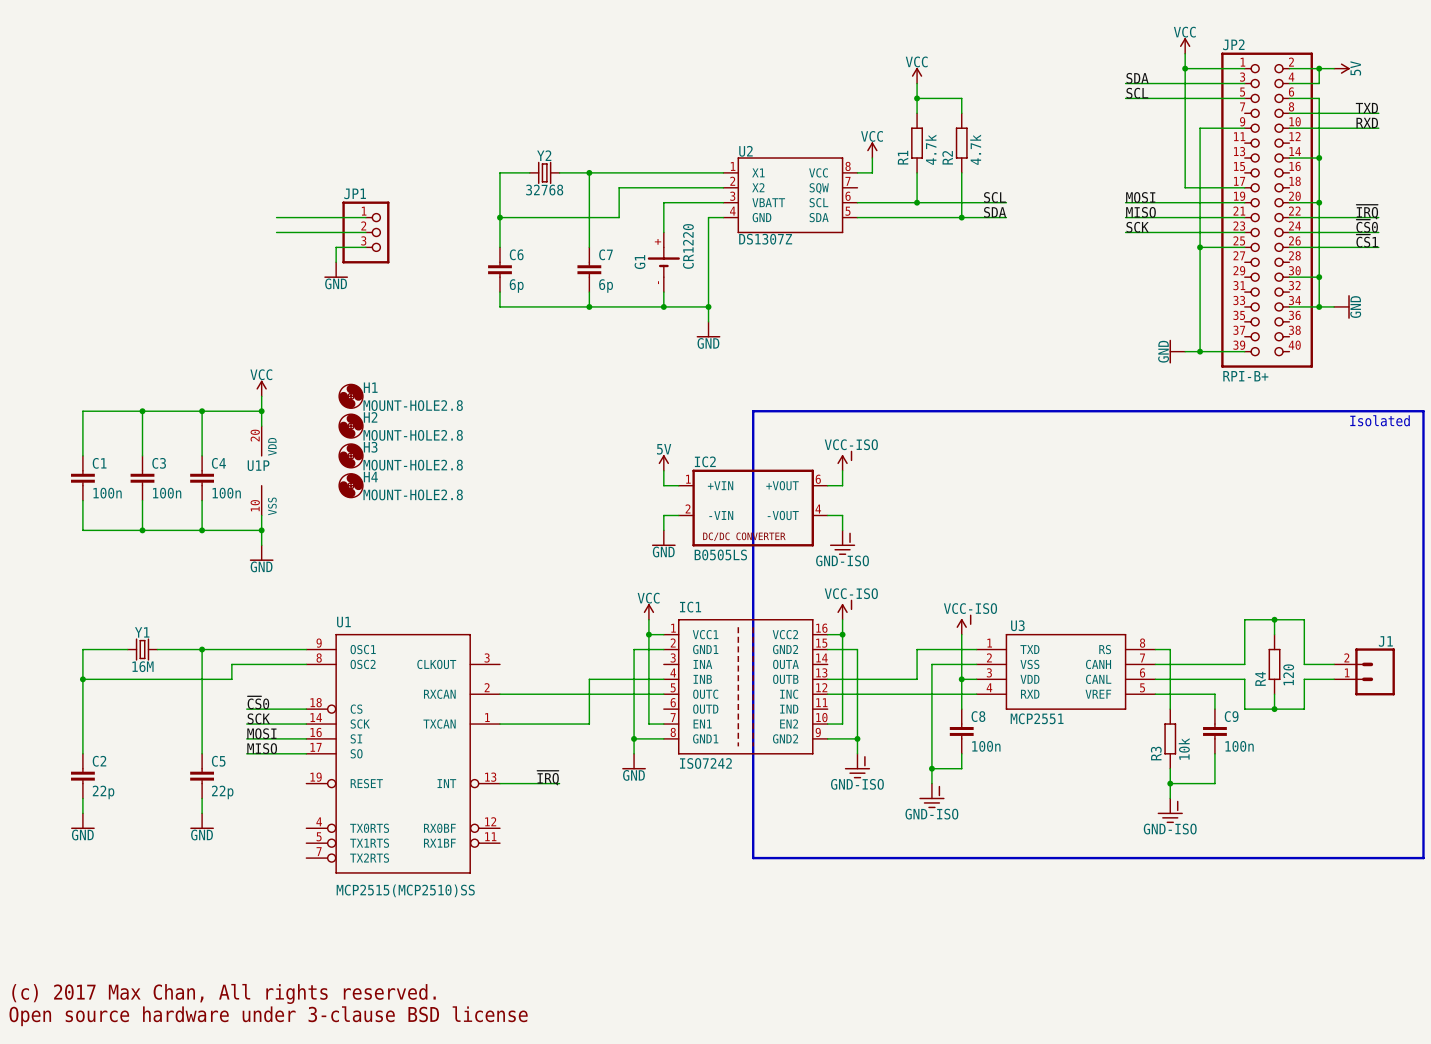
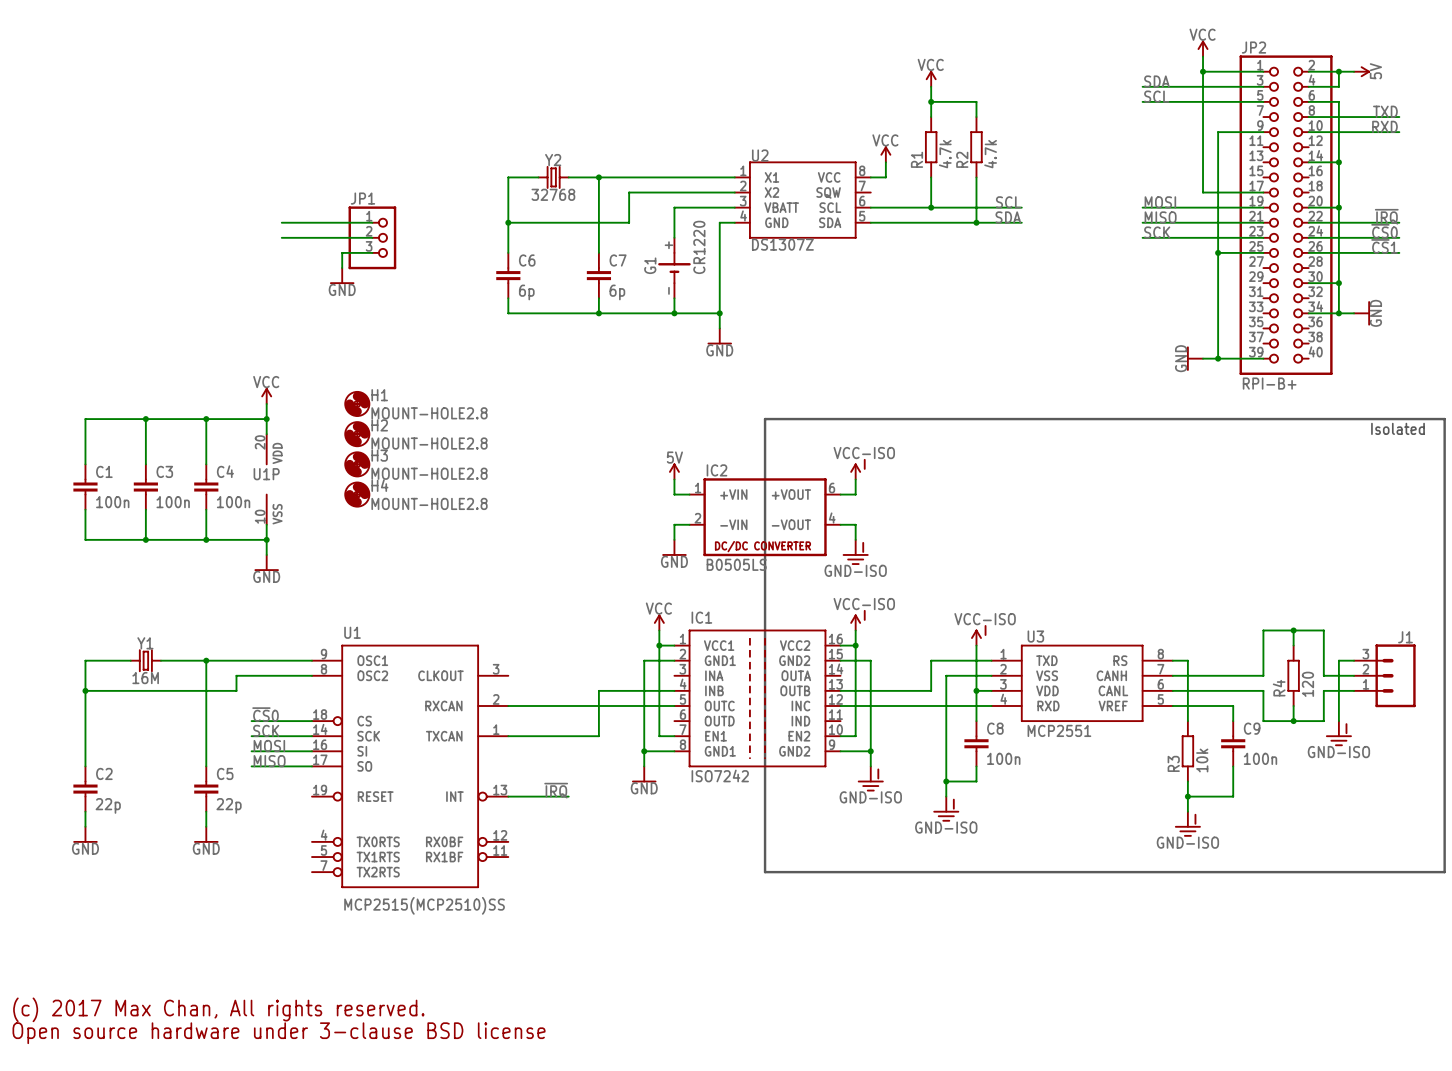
J1 symbol: [1334, 648, 1395, 696] -> [1354, 644, 1416, 708]
wire: none -> (1354, 660) (1338, 660) (1338, 721)
power symbol: none -> GND-ISO (1338, 733)

